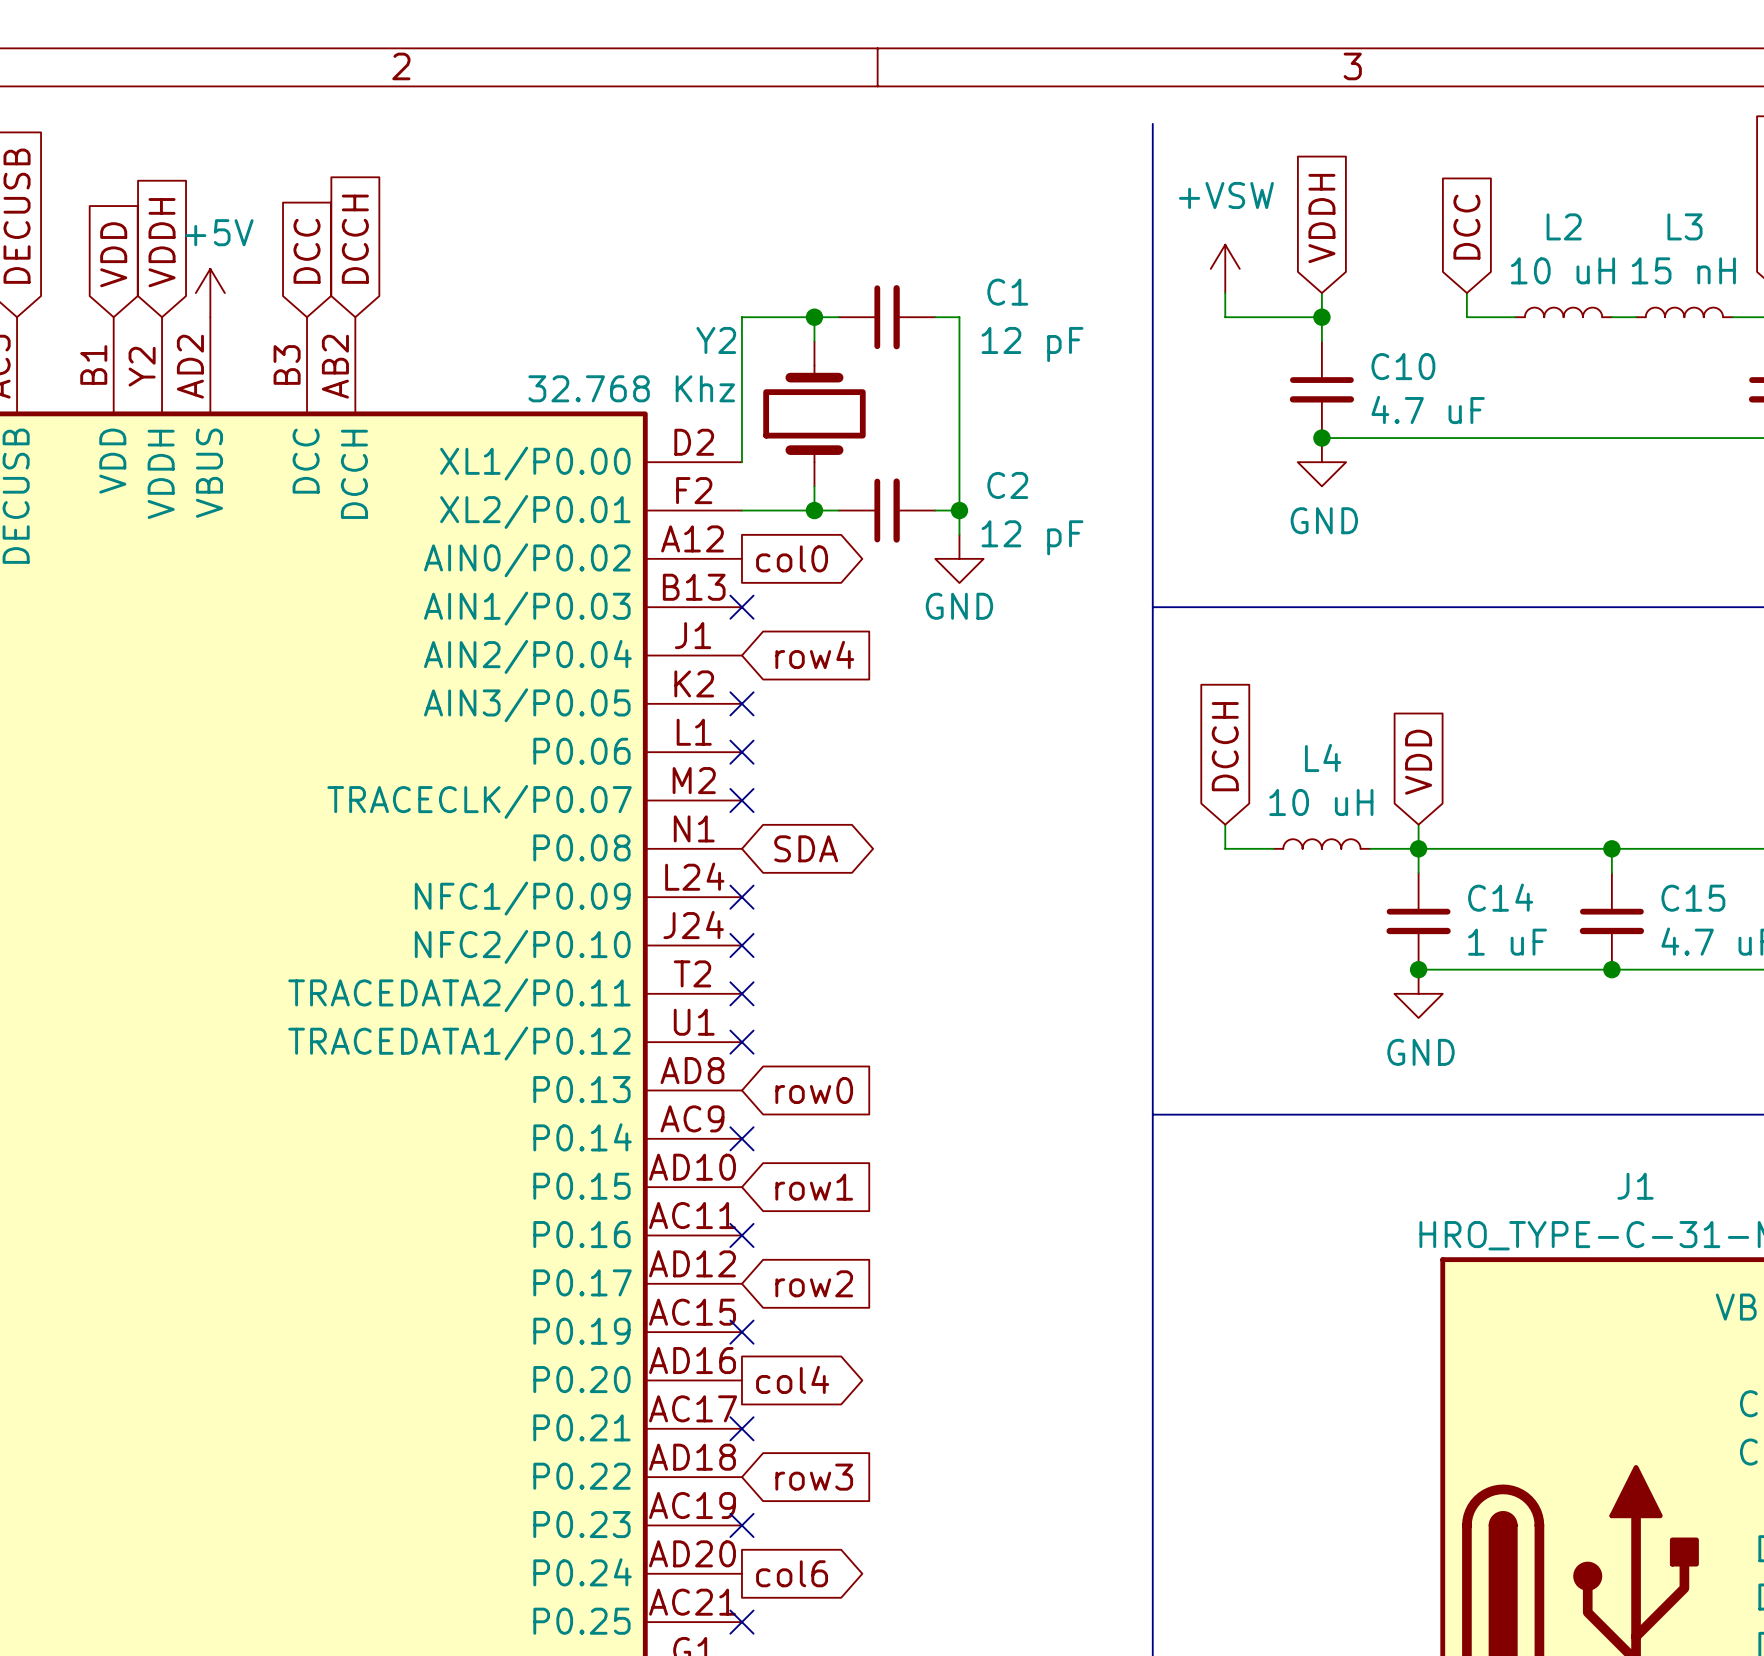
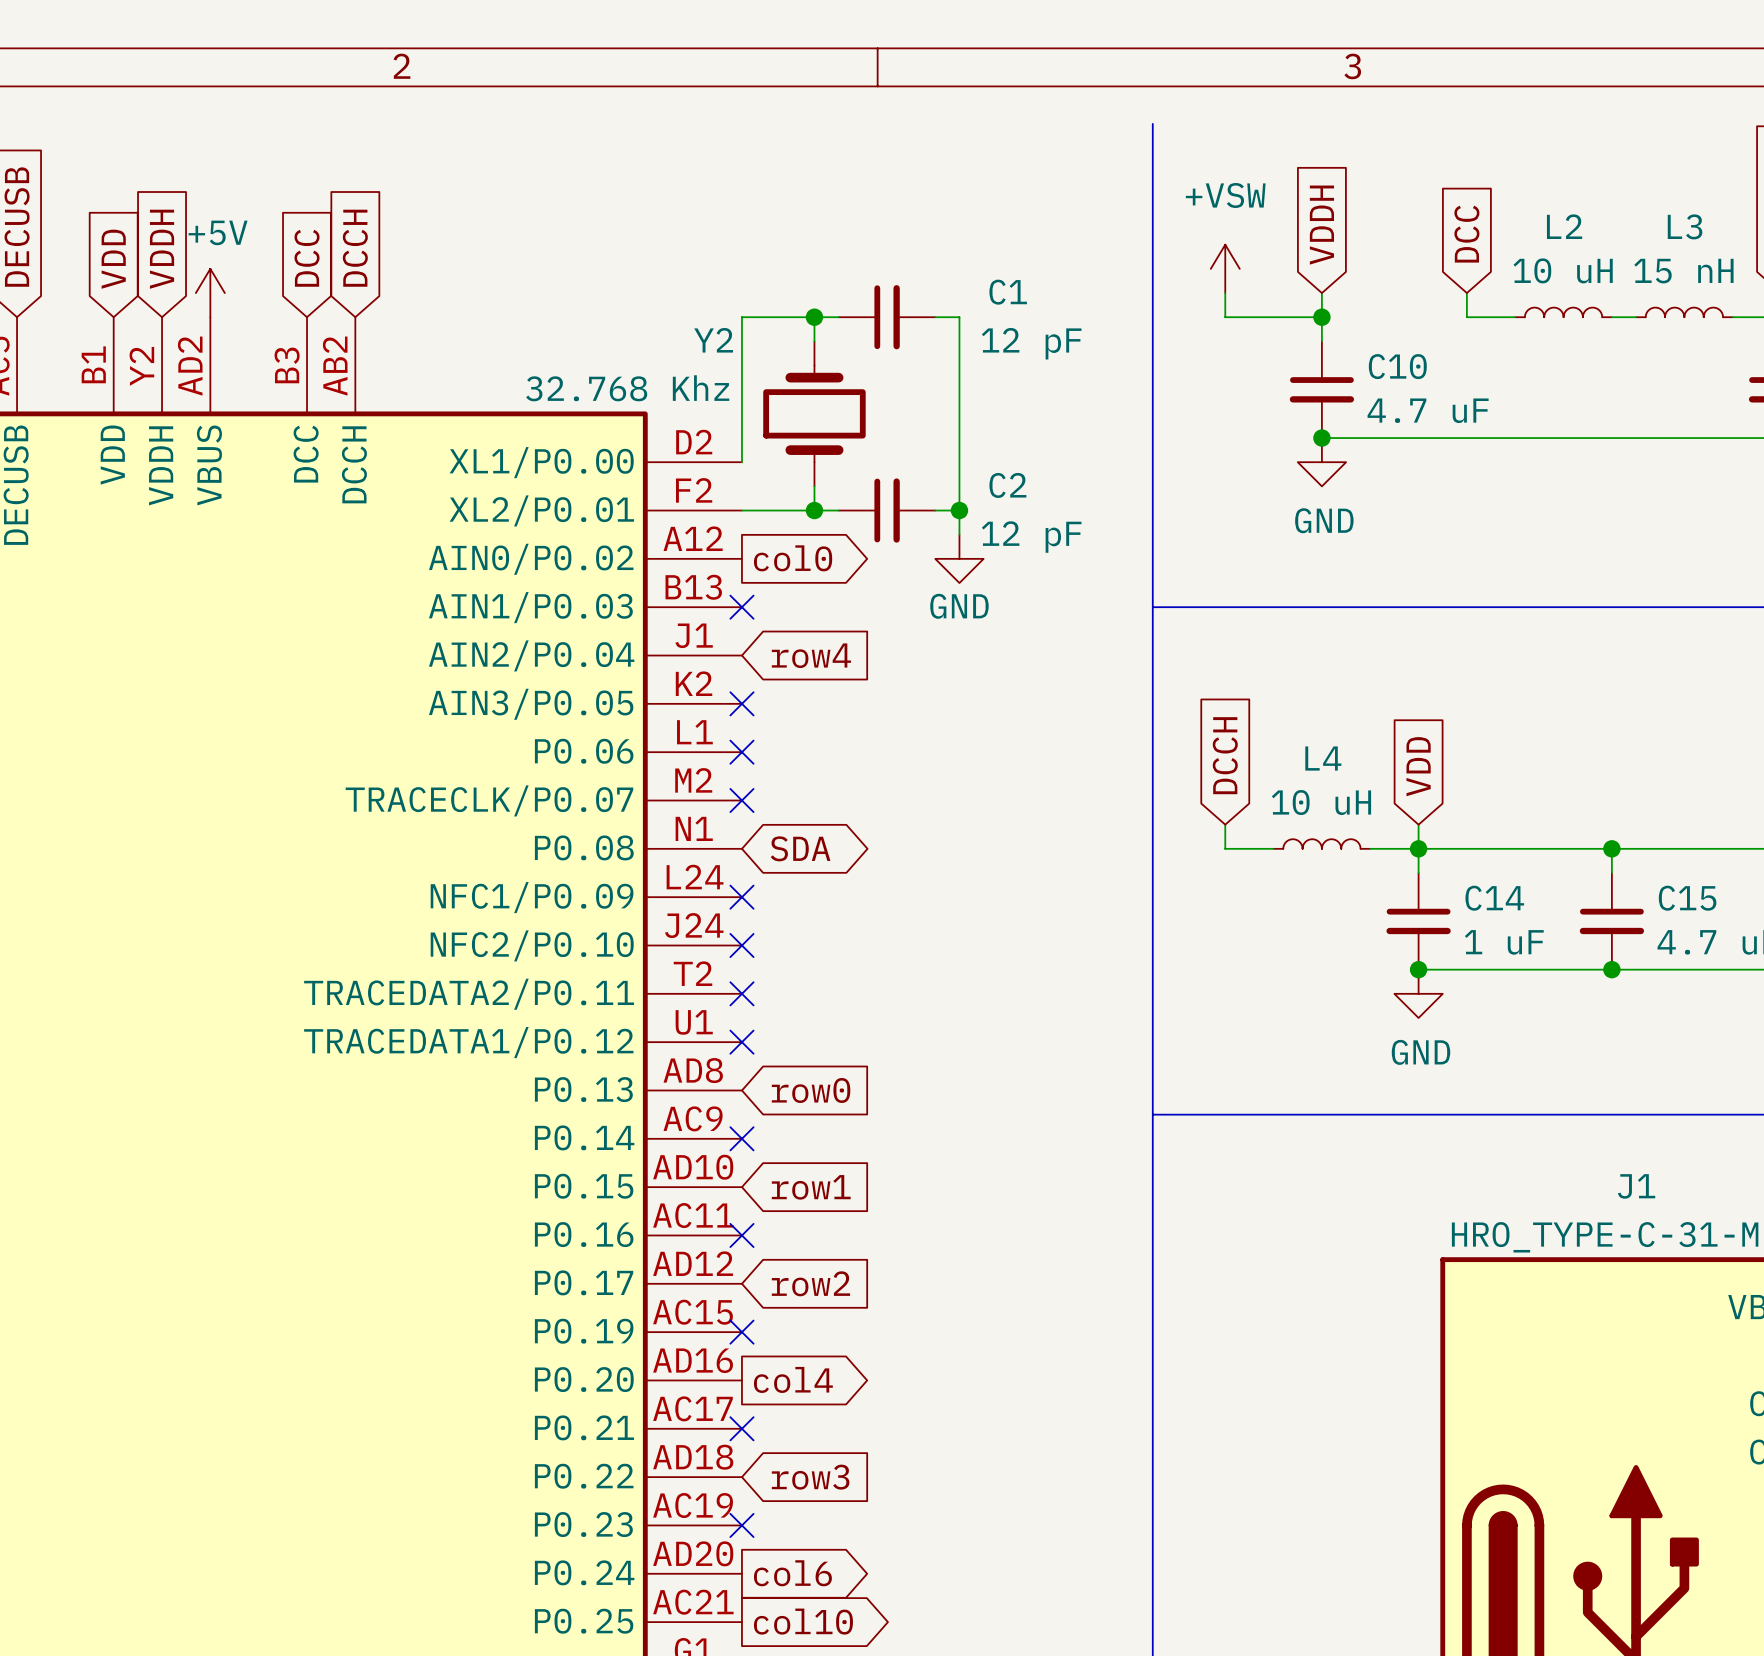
no-connect mark: (741, 1622) -> none
global label: none -> col10 (803, 1621)

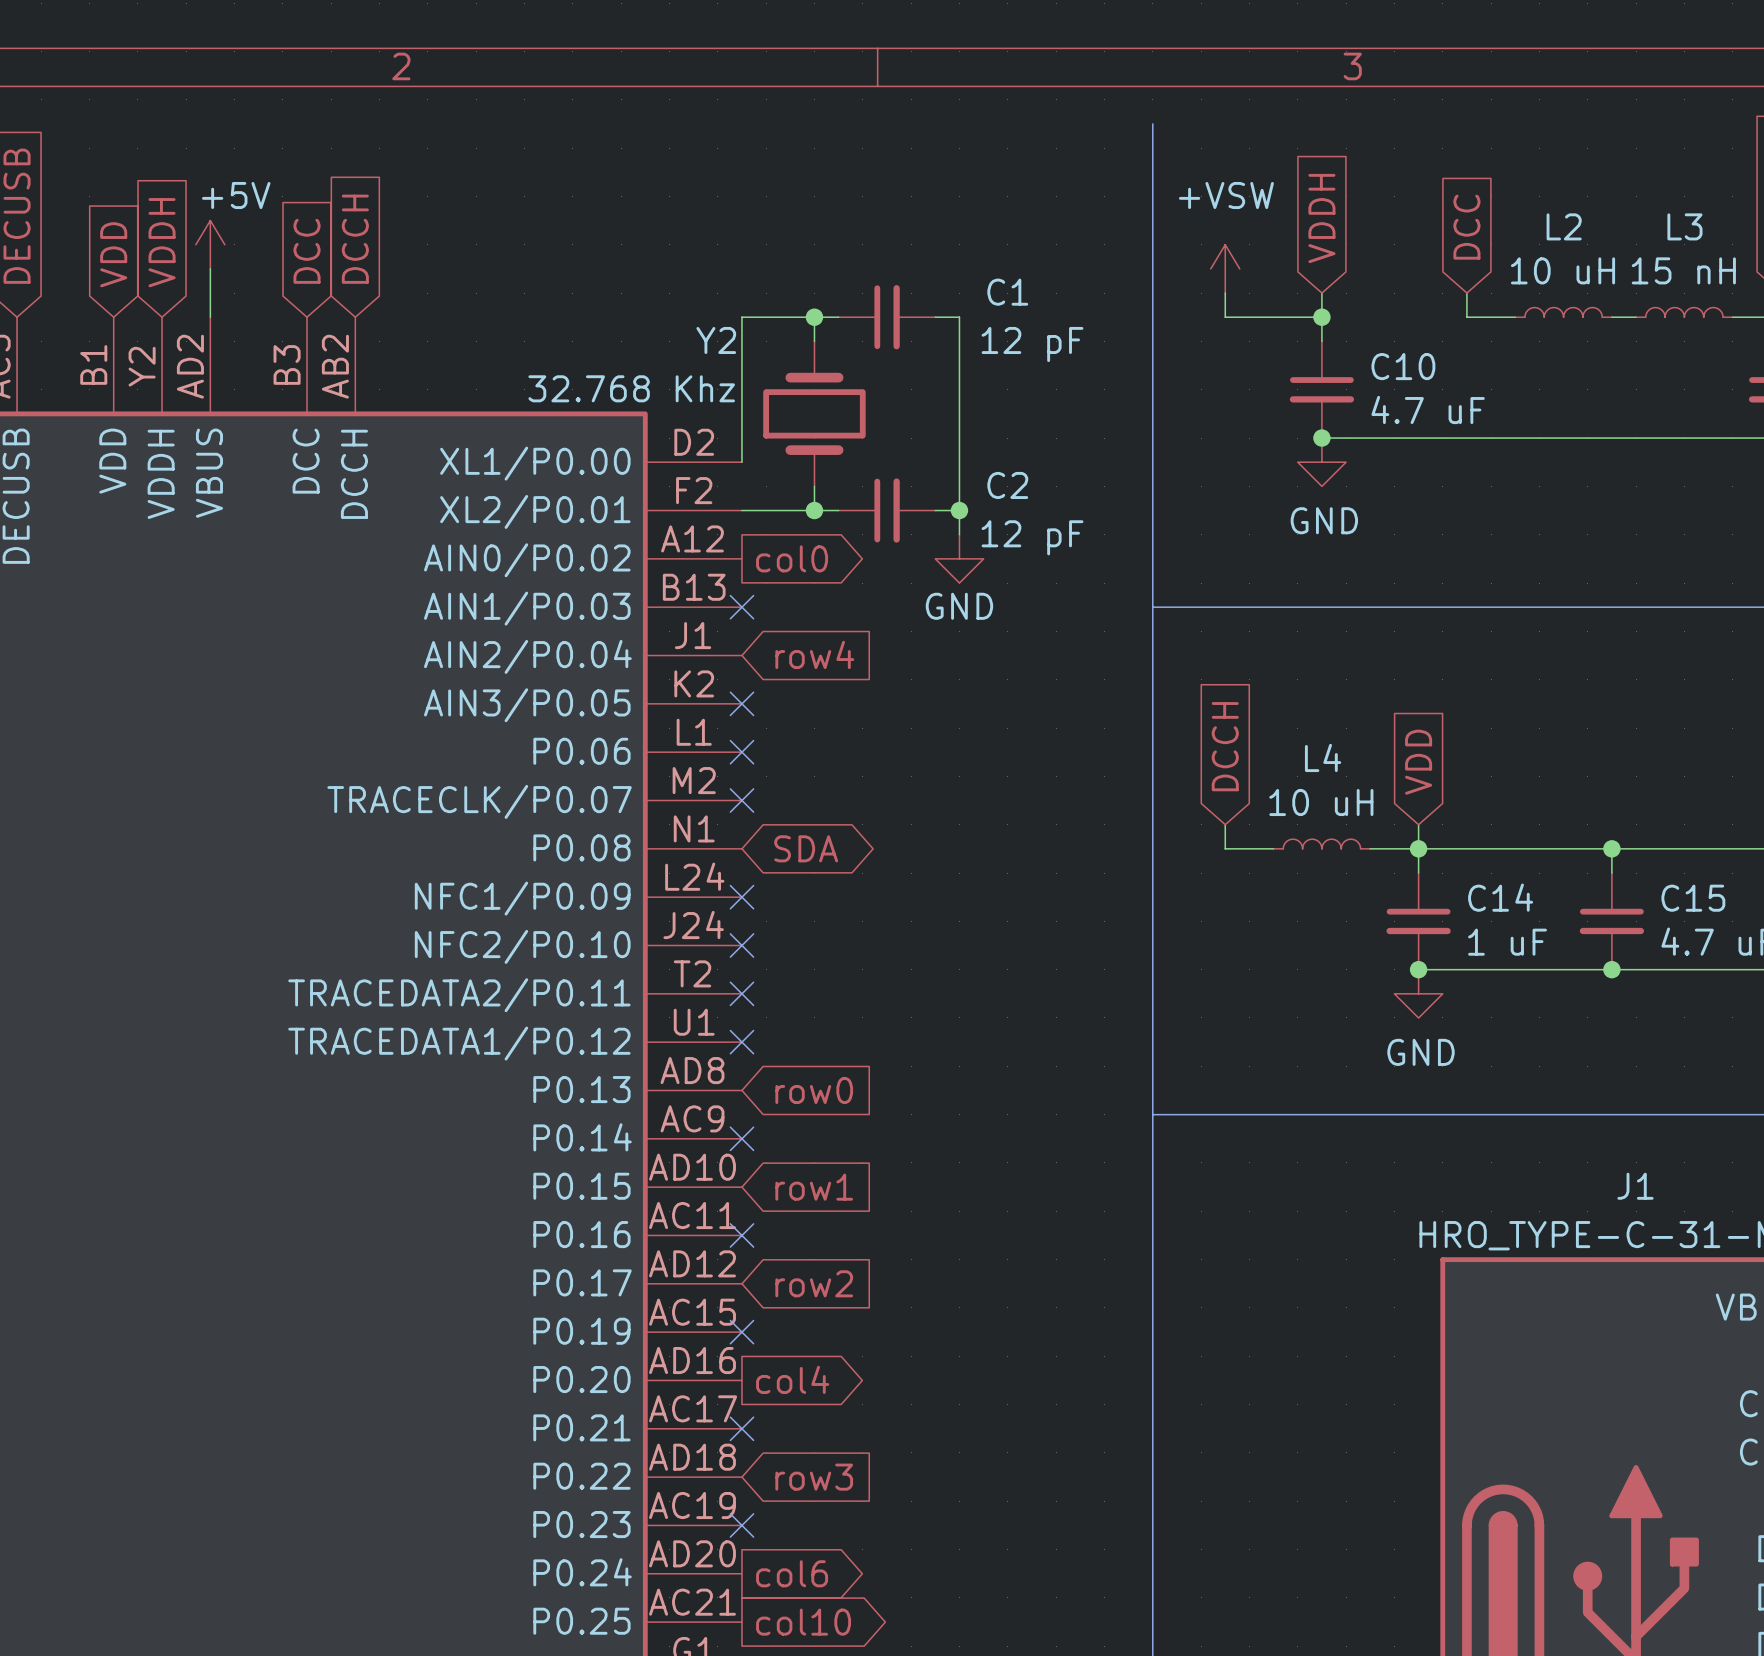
power symbol text position: +5V (218, 232) -> +5V (236, 195)
power symbol position: +5V (210, 293) -> +5V (210, 244)

